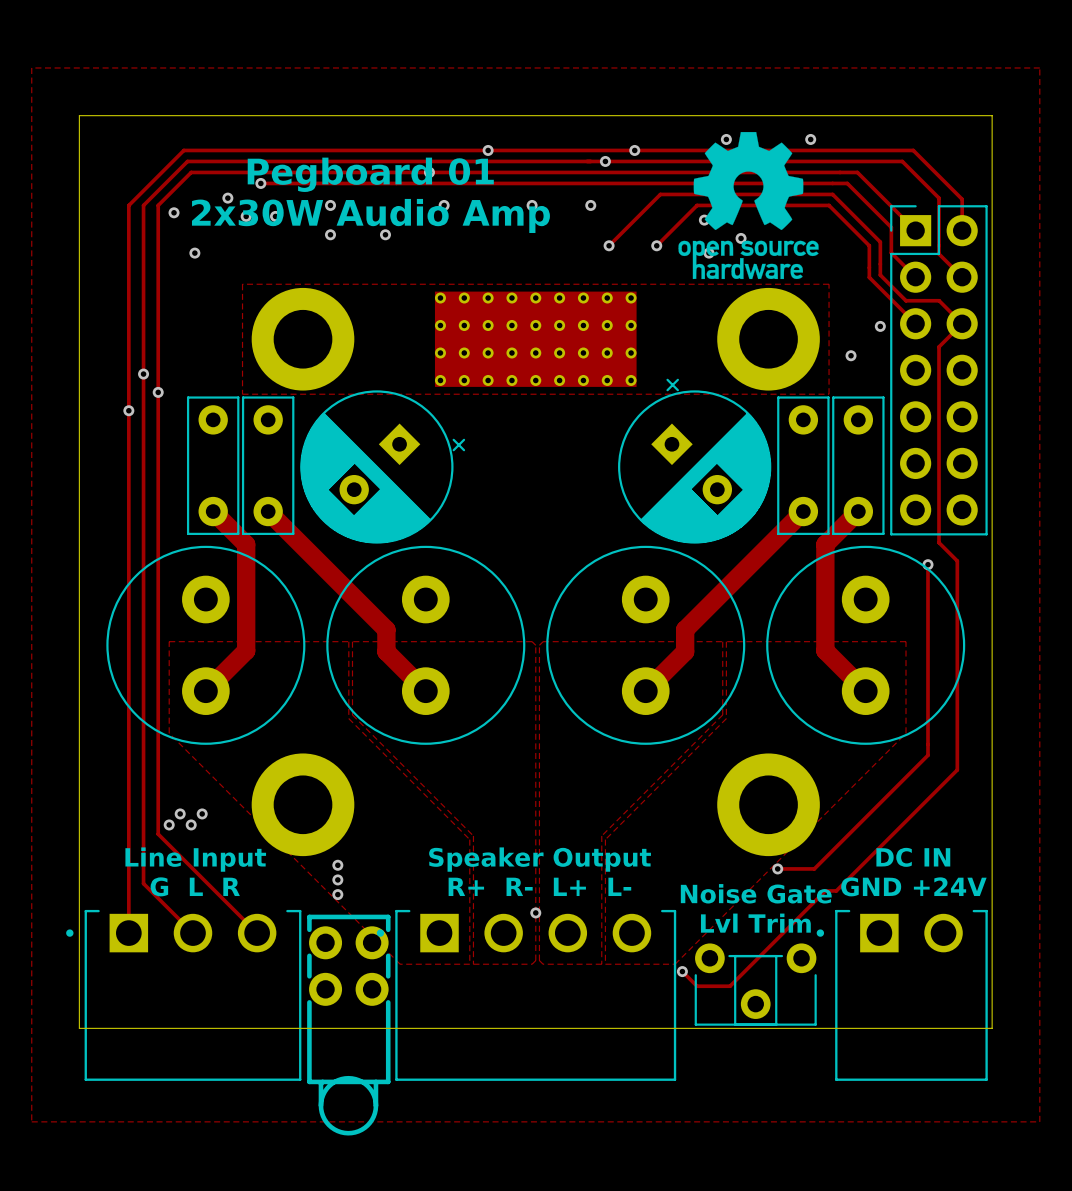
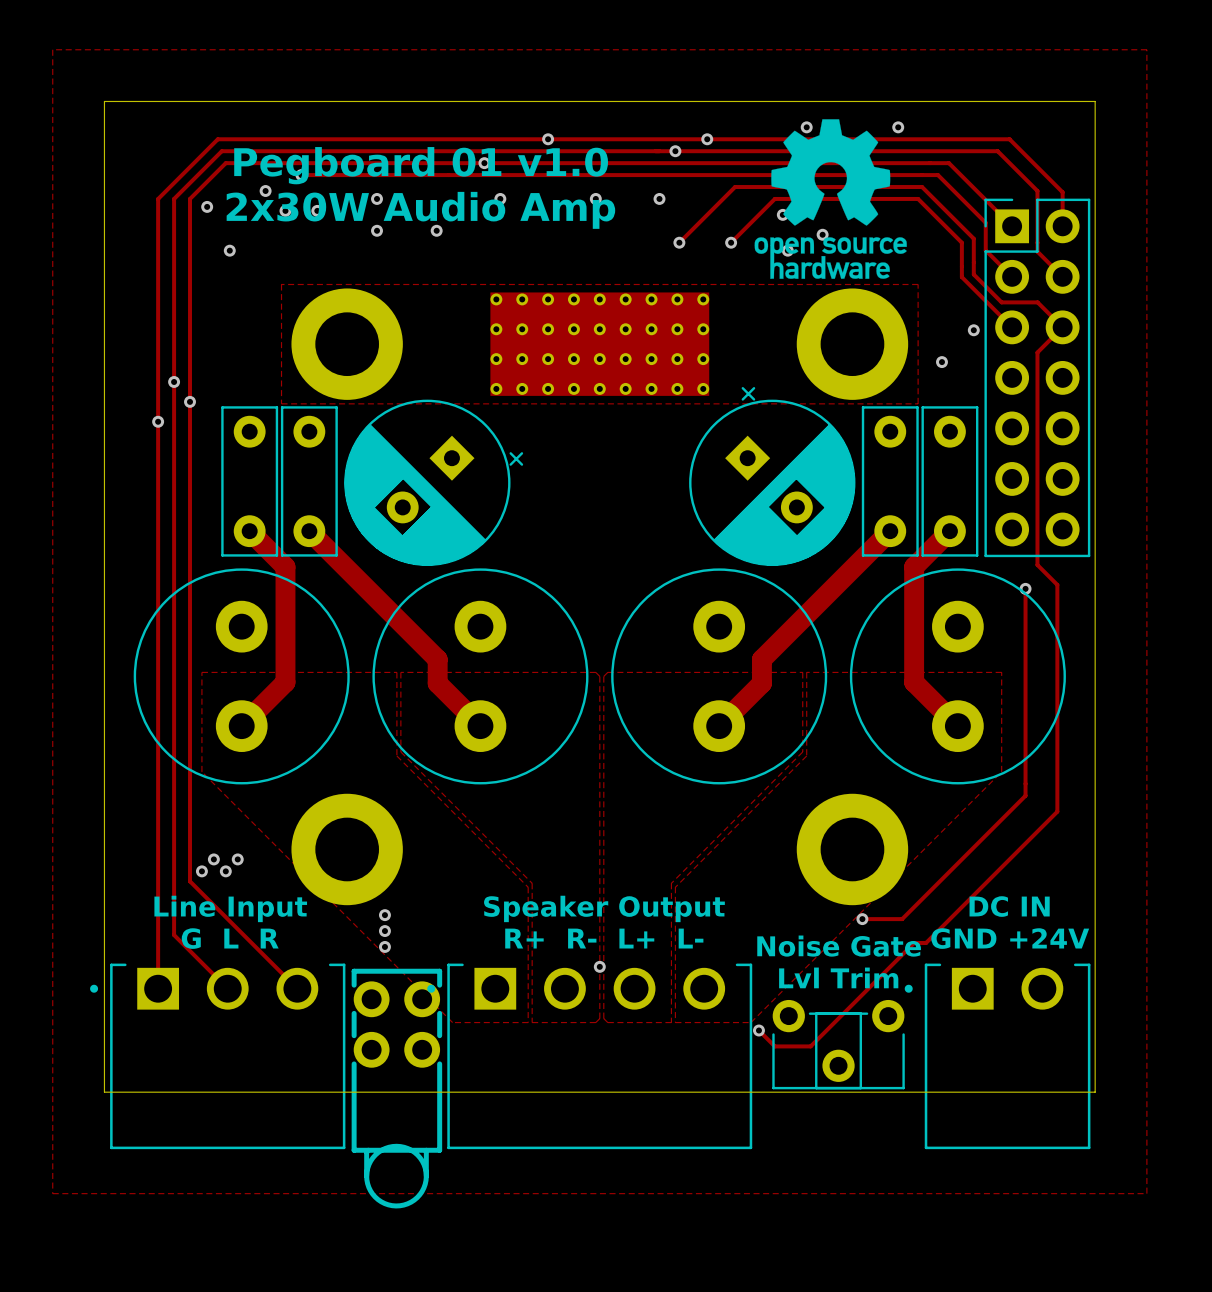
text: Pegboard 01 (370, 174) -> Pegboard 01 v1.0 (421, 165)

